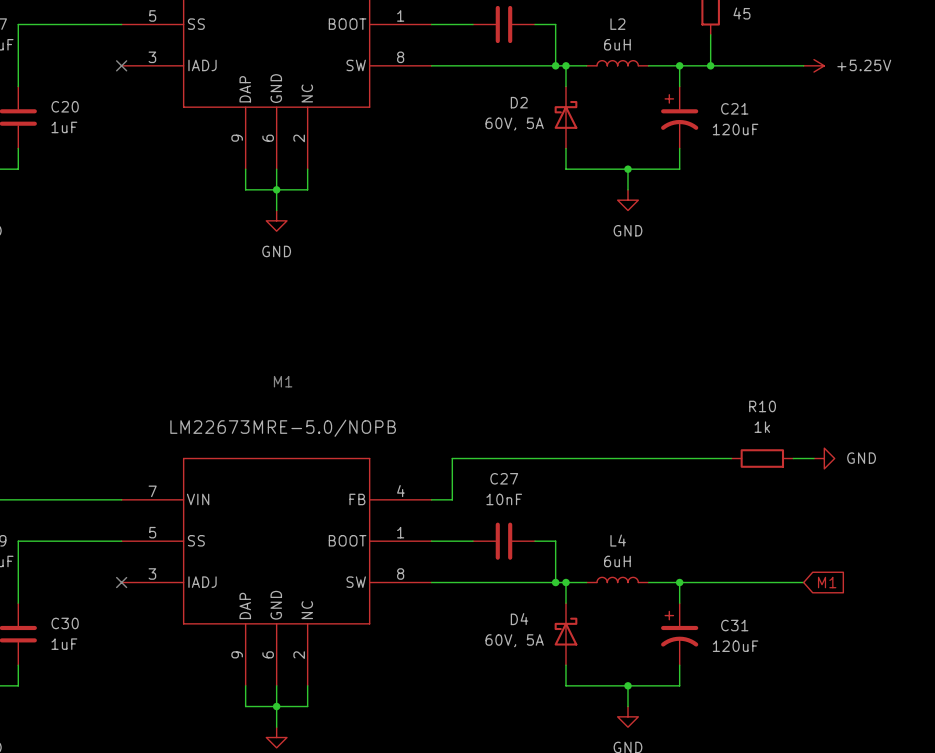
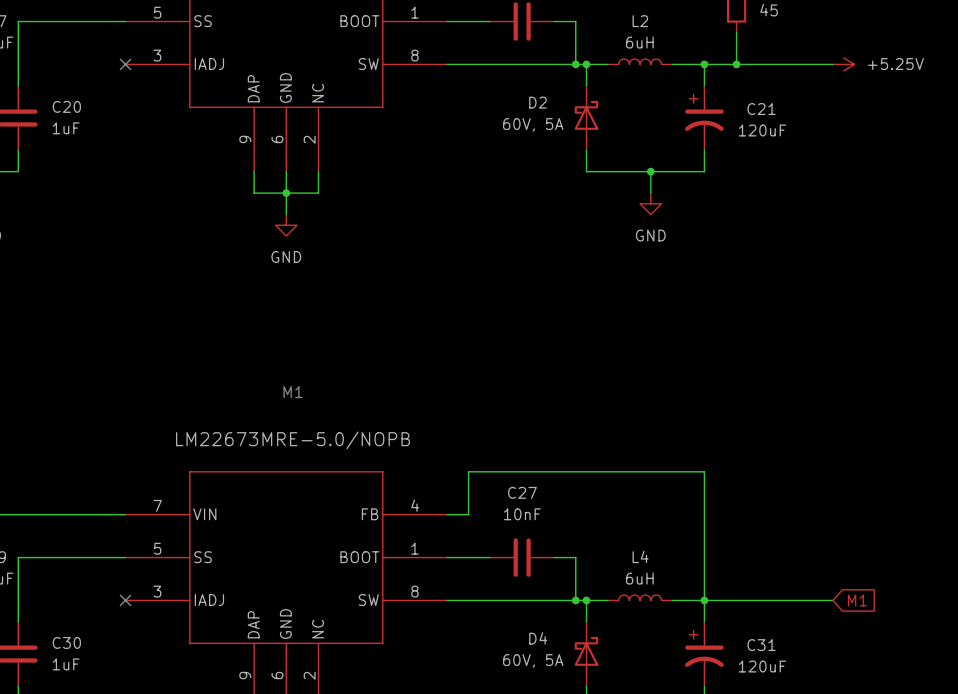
wire: (679, 458) (731, 458) -> (704, 471) (704, 600)
R10: 1k (762, 458) -> none
wire: (793, 458) (814, 458) -> none
power symbol: GND (824, 458) -> none

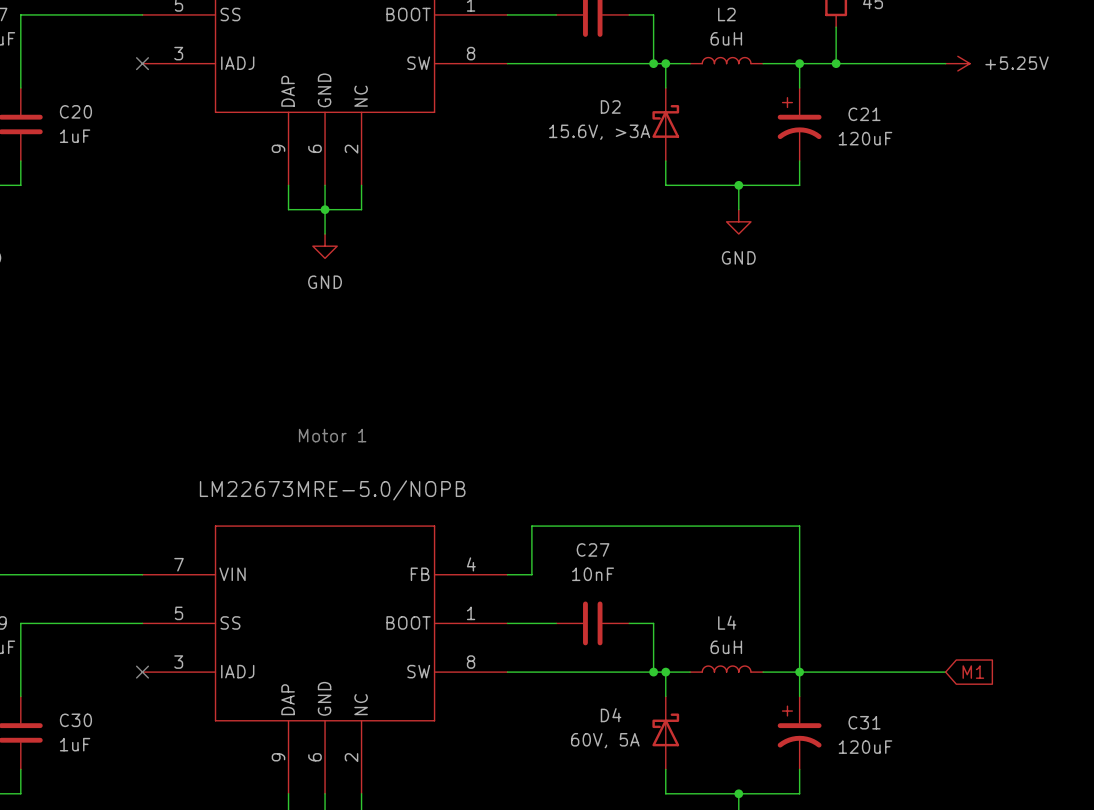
D2 value: 60V, 5A (533, 124) -> 15.6V, >3A (599, 132)
text: M1 (292, 392) -> Motor 1 (332, 435)

